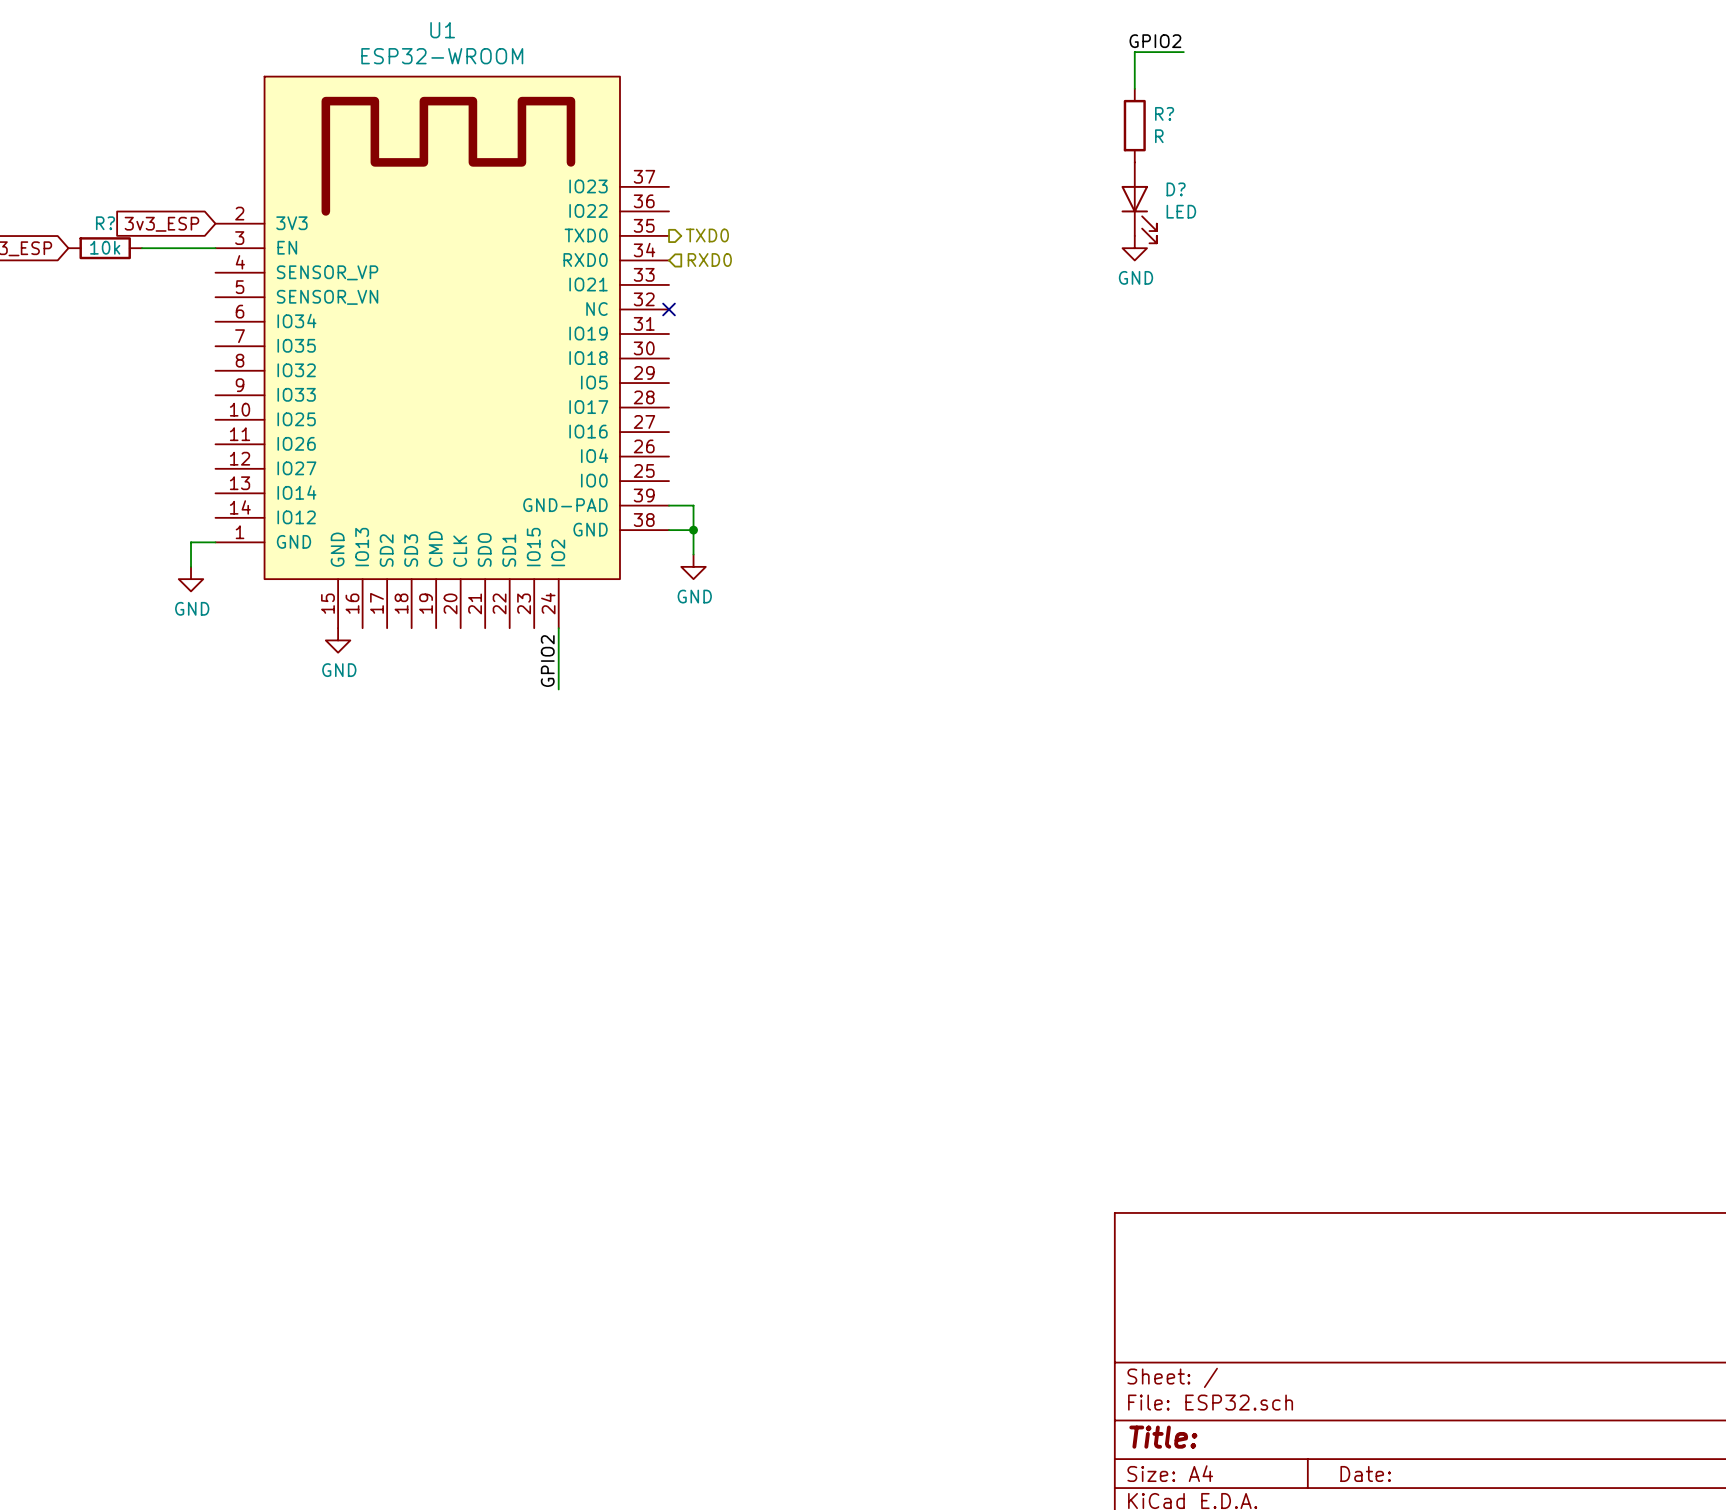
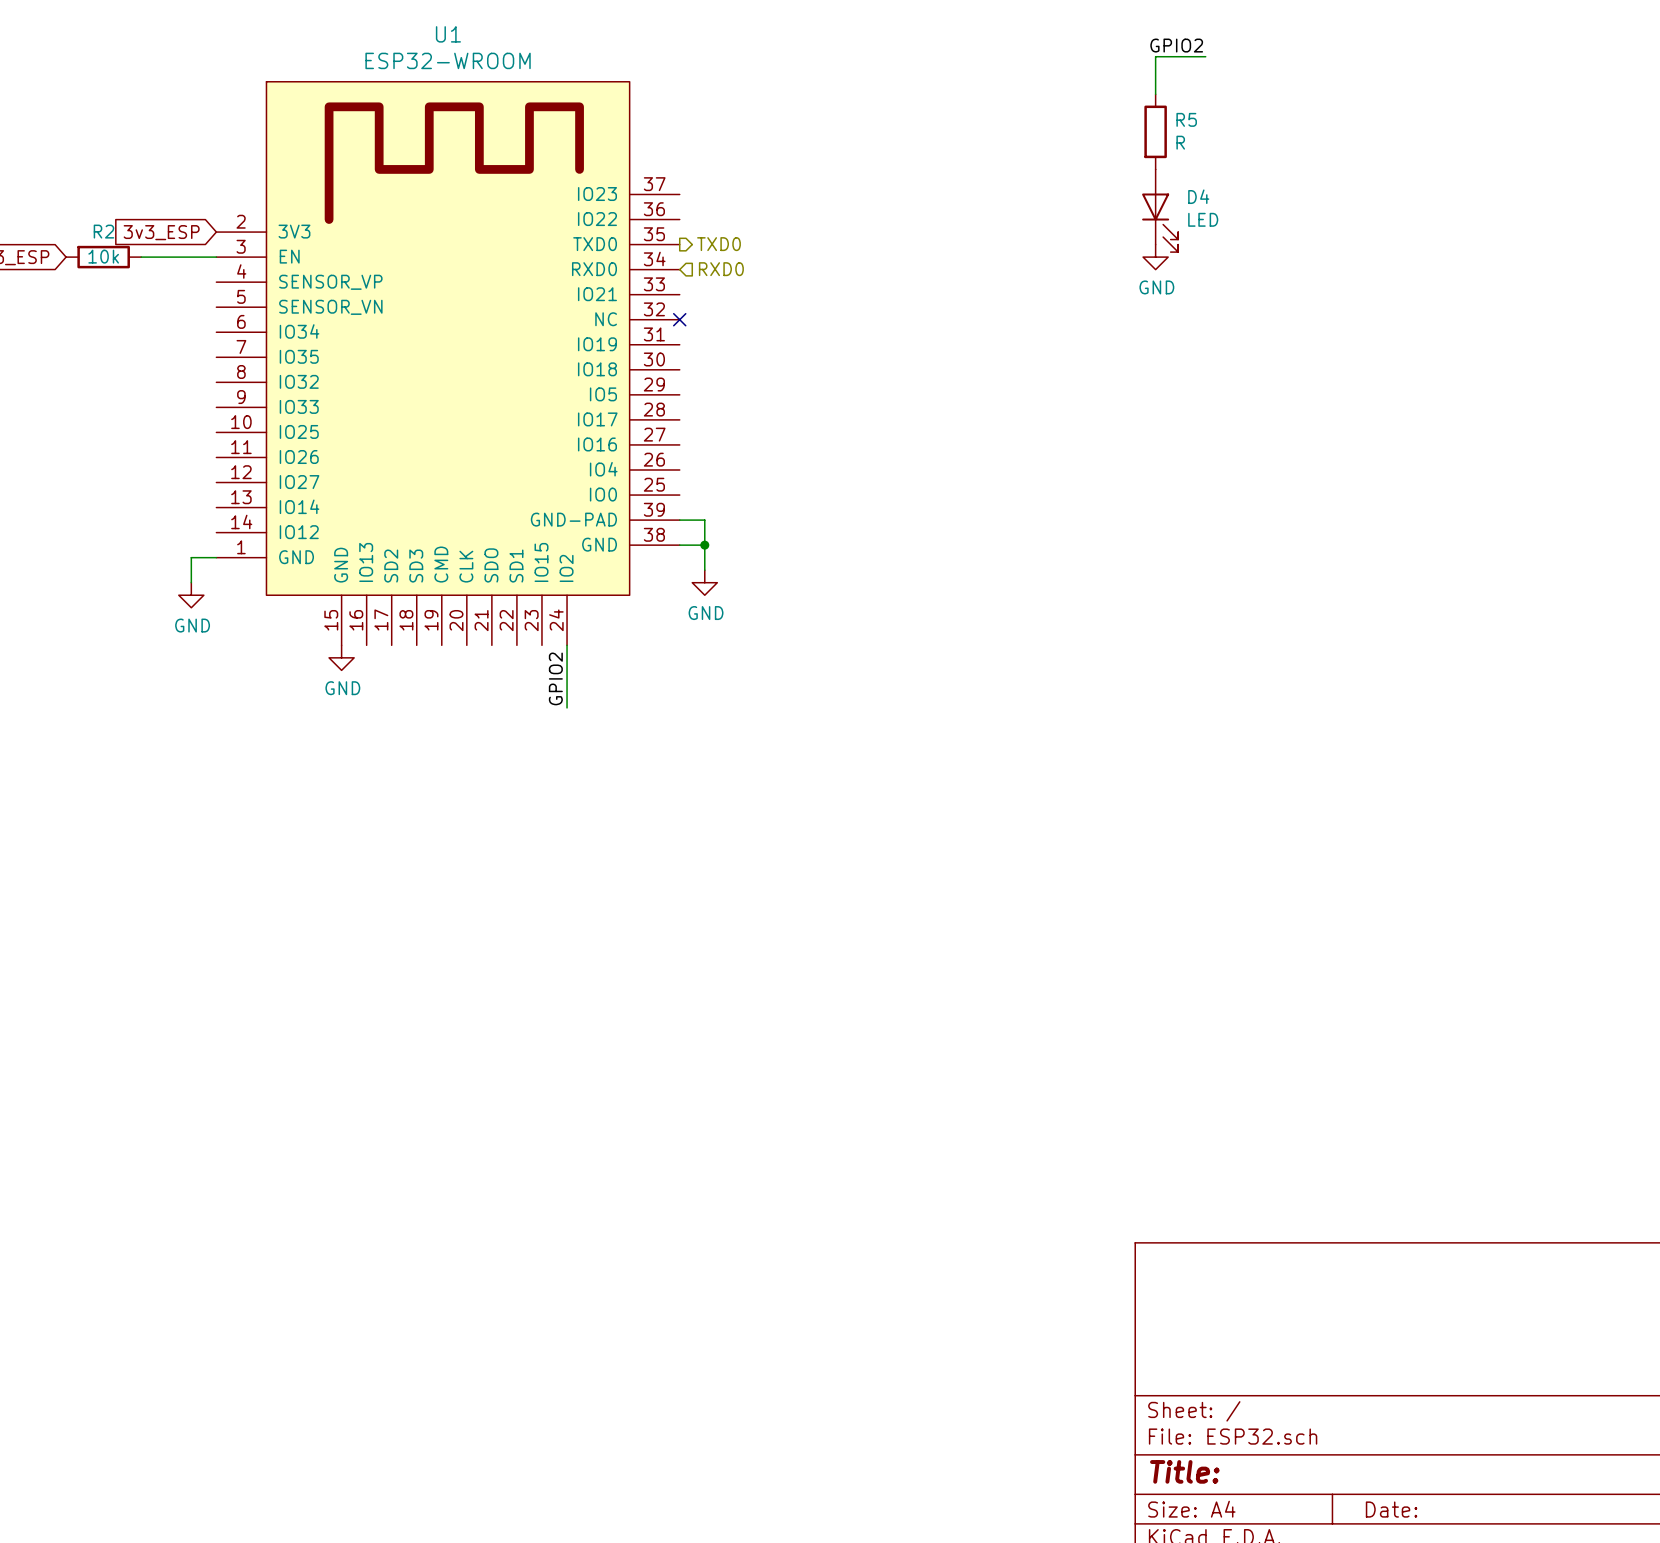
R? name: R? (1164, 113) -> R5 (1186, 119)
D? name: D? (1176, 189) -> D4 (1198, 196)
R? name: R? (105, 223) -> R2 (103, 231)

